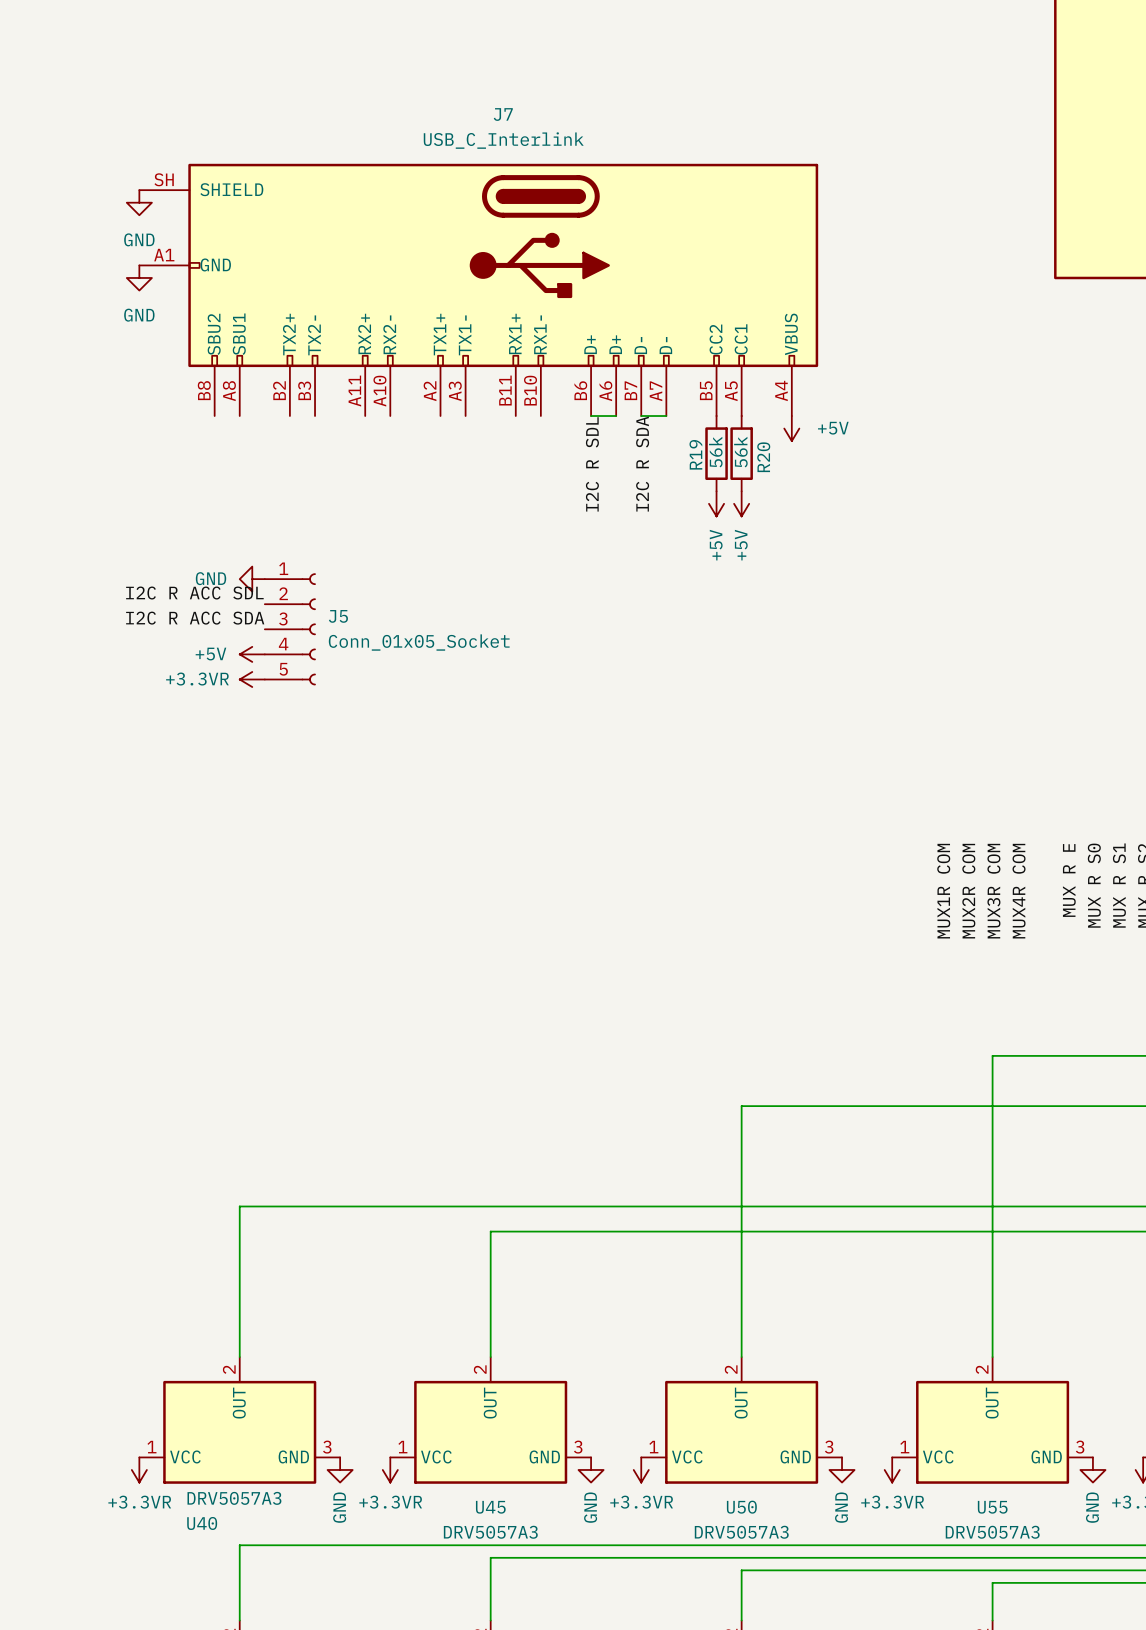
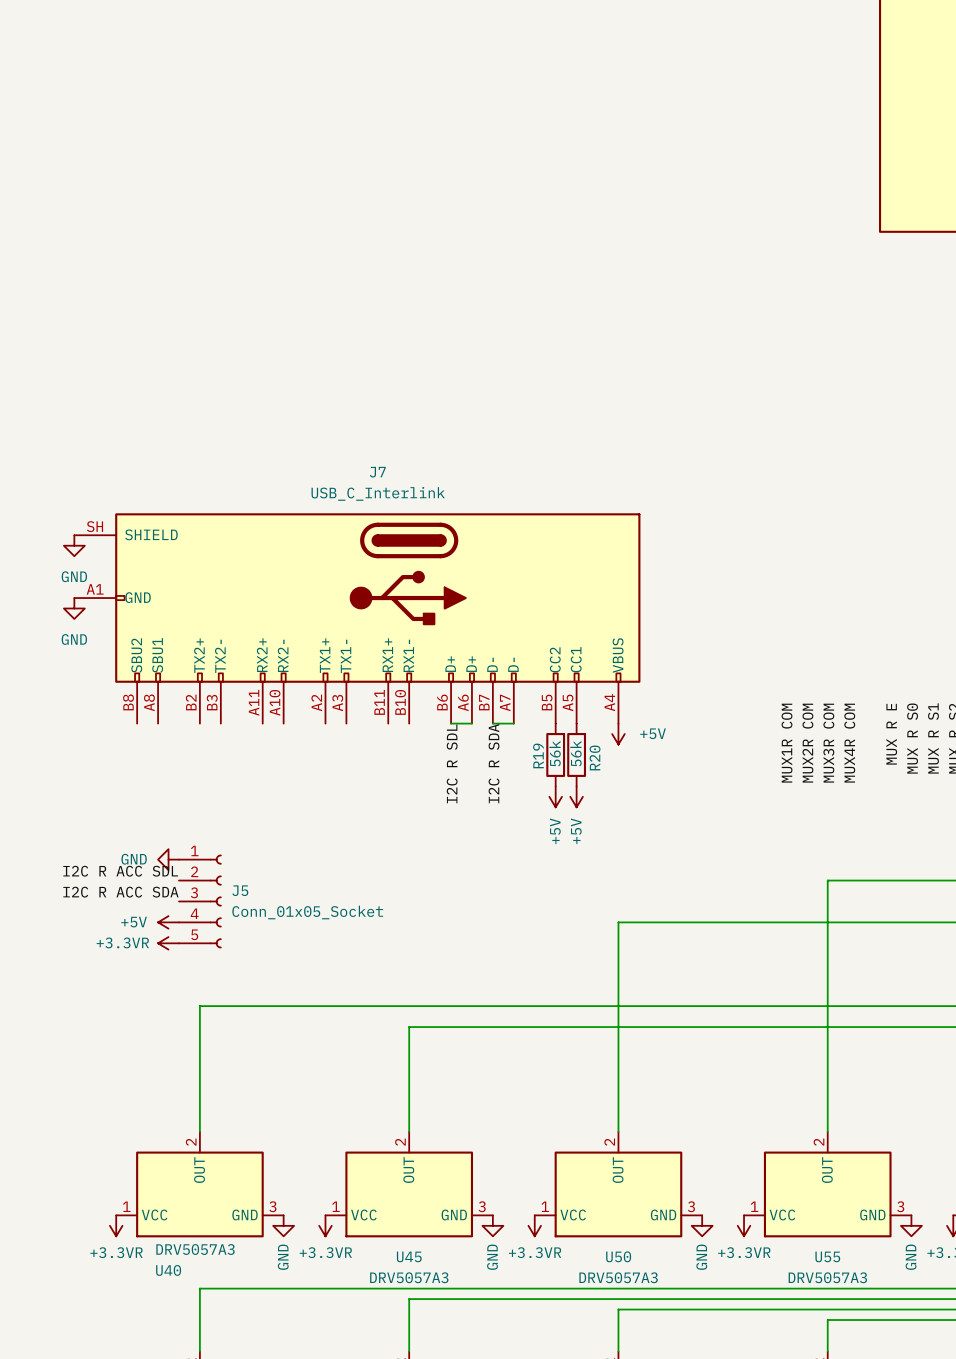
power symbol: GND (139, 202) -> none
power symbol: GND (139, 277) -> none
J7 position: (478, 289) -> (357, 618)
wire: (591, 416) (616, 416) -> none
wire: (641, 416) (666, 416) -> none
power symbol: +5V (791, 428) -> none
R19 position: (716, 453) -> (555, 754)
R20 position: (741, 453) -> (576, 754)
label: I2C R SDL (592, 464) -> none
label: I2C R SDA (642, 464) -> none
power symbol: +5V (716, 503) -> none
power symbol: +5V (741, 503) -> none
power symbol: GND (252, 579) -> none
label: I2C R ACC SDL (194, 593) -> none
label: I2C R ACC SDA (195, 618) -> none
J5 position: (290, 629) -> (200, 901)
power symbol: none -> GND (74, 545)
power symbol: +5V (252, 654) -> none
power symbol: +3.3VR (252, 679) -> none
power symbol: none -> GND (74, 608)
wire: none -> (451, 723) (471, 723)
wire: none -> (492, 723) (513, 723)
power symbol: none -> +5V (618, 734)
label: none -> I2C R SDA (494, 763)
label: none -> I2C R SDL (452, 763)
power symbol: none -> +5V (555, 796)
power symbol: none -> +5V (576, 796)
power symbol: none -> GND (168, 859)
label: none -> I2C R ACC SDL (120, 871)
label: none -> I2C R ACC SDA (120, 892)
power symbol: none -> +5V (168, 922)
power symbol: none -> +3.3VR (168, 943)

